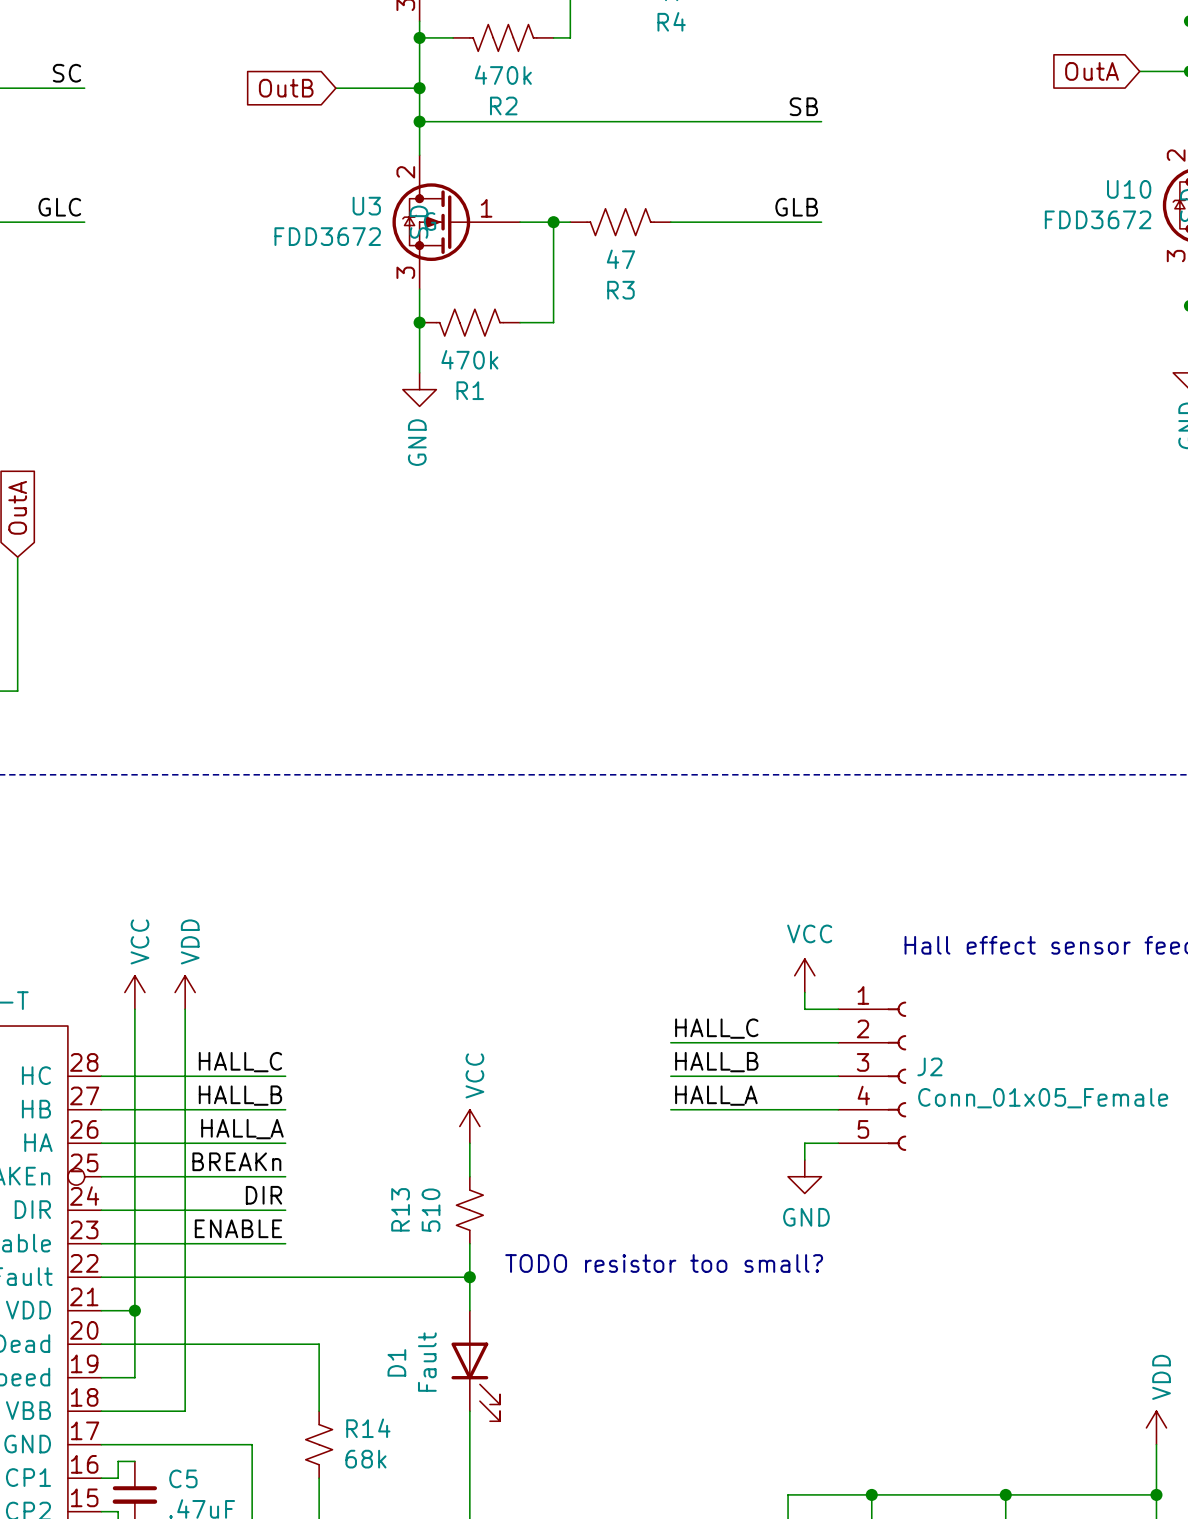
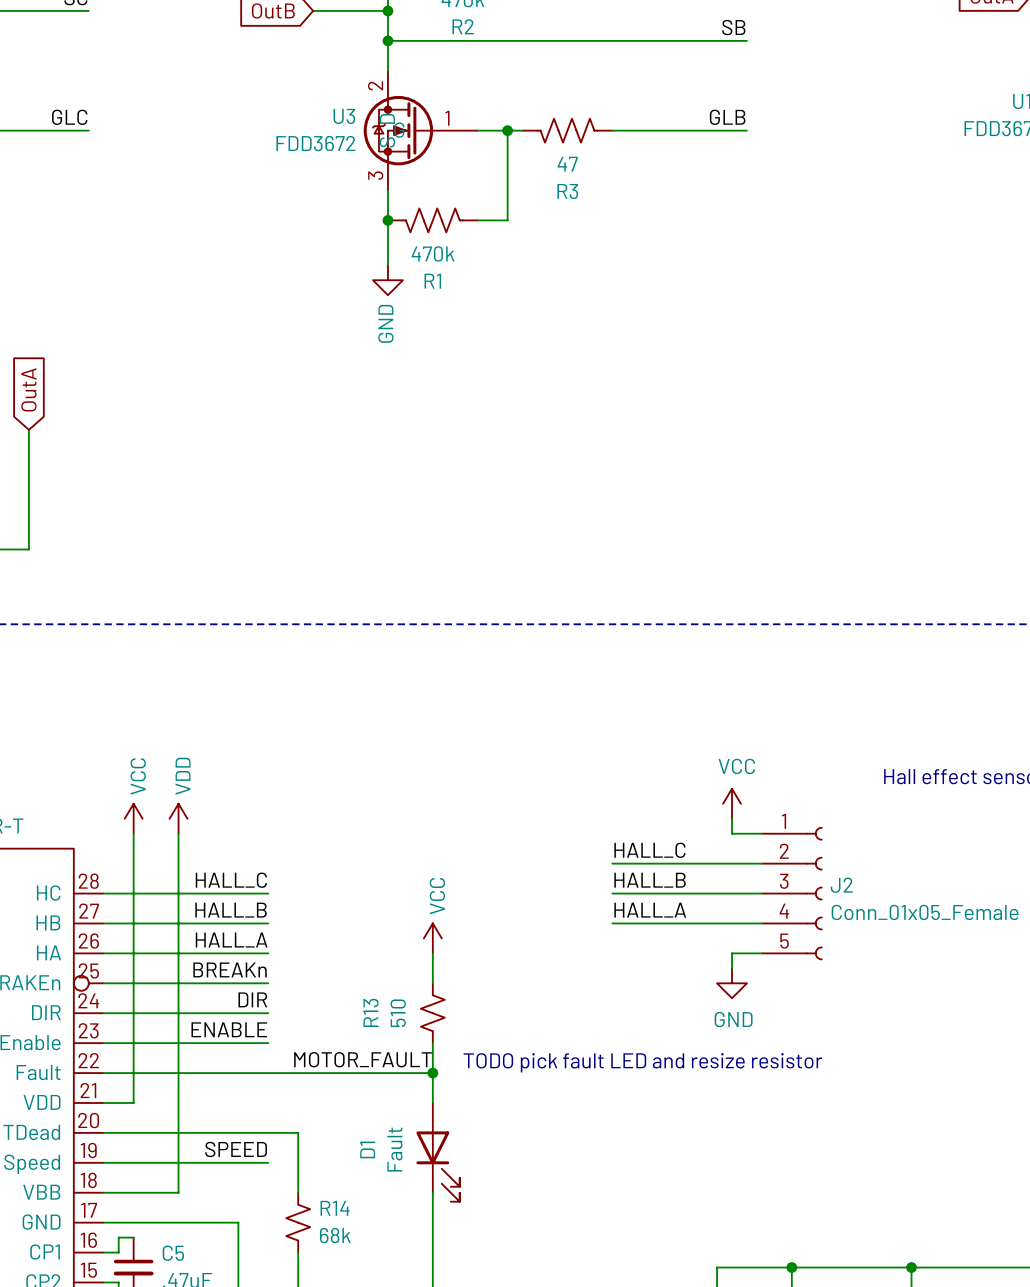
label: none -> MOTOR_FAULT (363, 1059)
text: TODO resistor too small? (664, 1263) -> TODO pick fault LED and resize resistor (642, 1062)
wire: (134, 1310) (134, 1377) -> (268, 1162) (133, 1162)
junction: (134, 1310) -> none
label: none -> SPEED (236, 1149)

